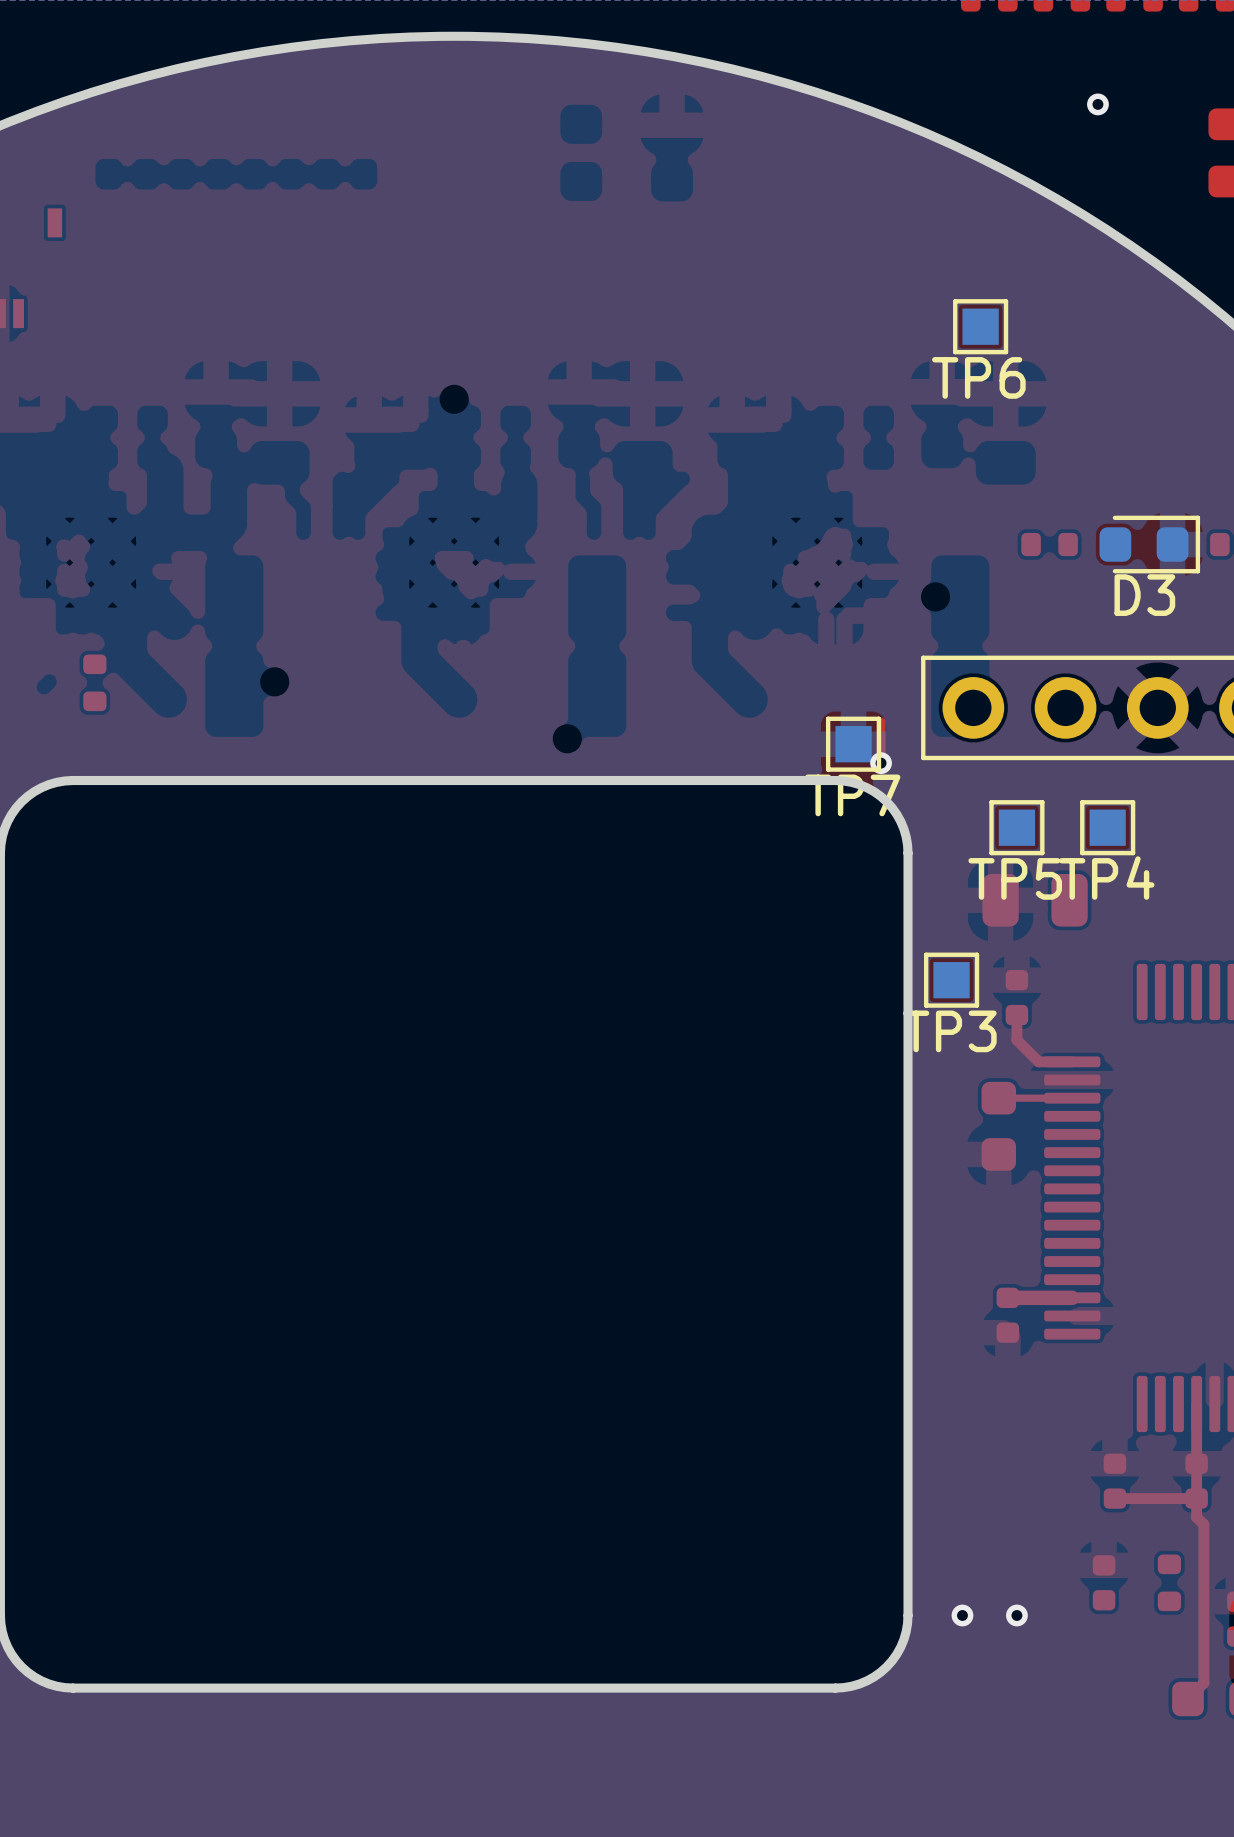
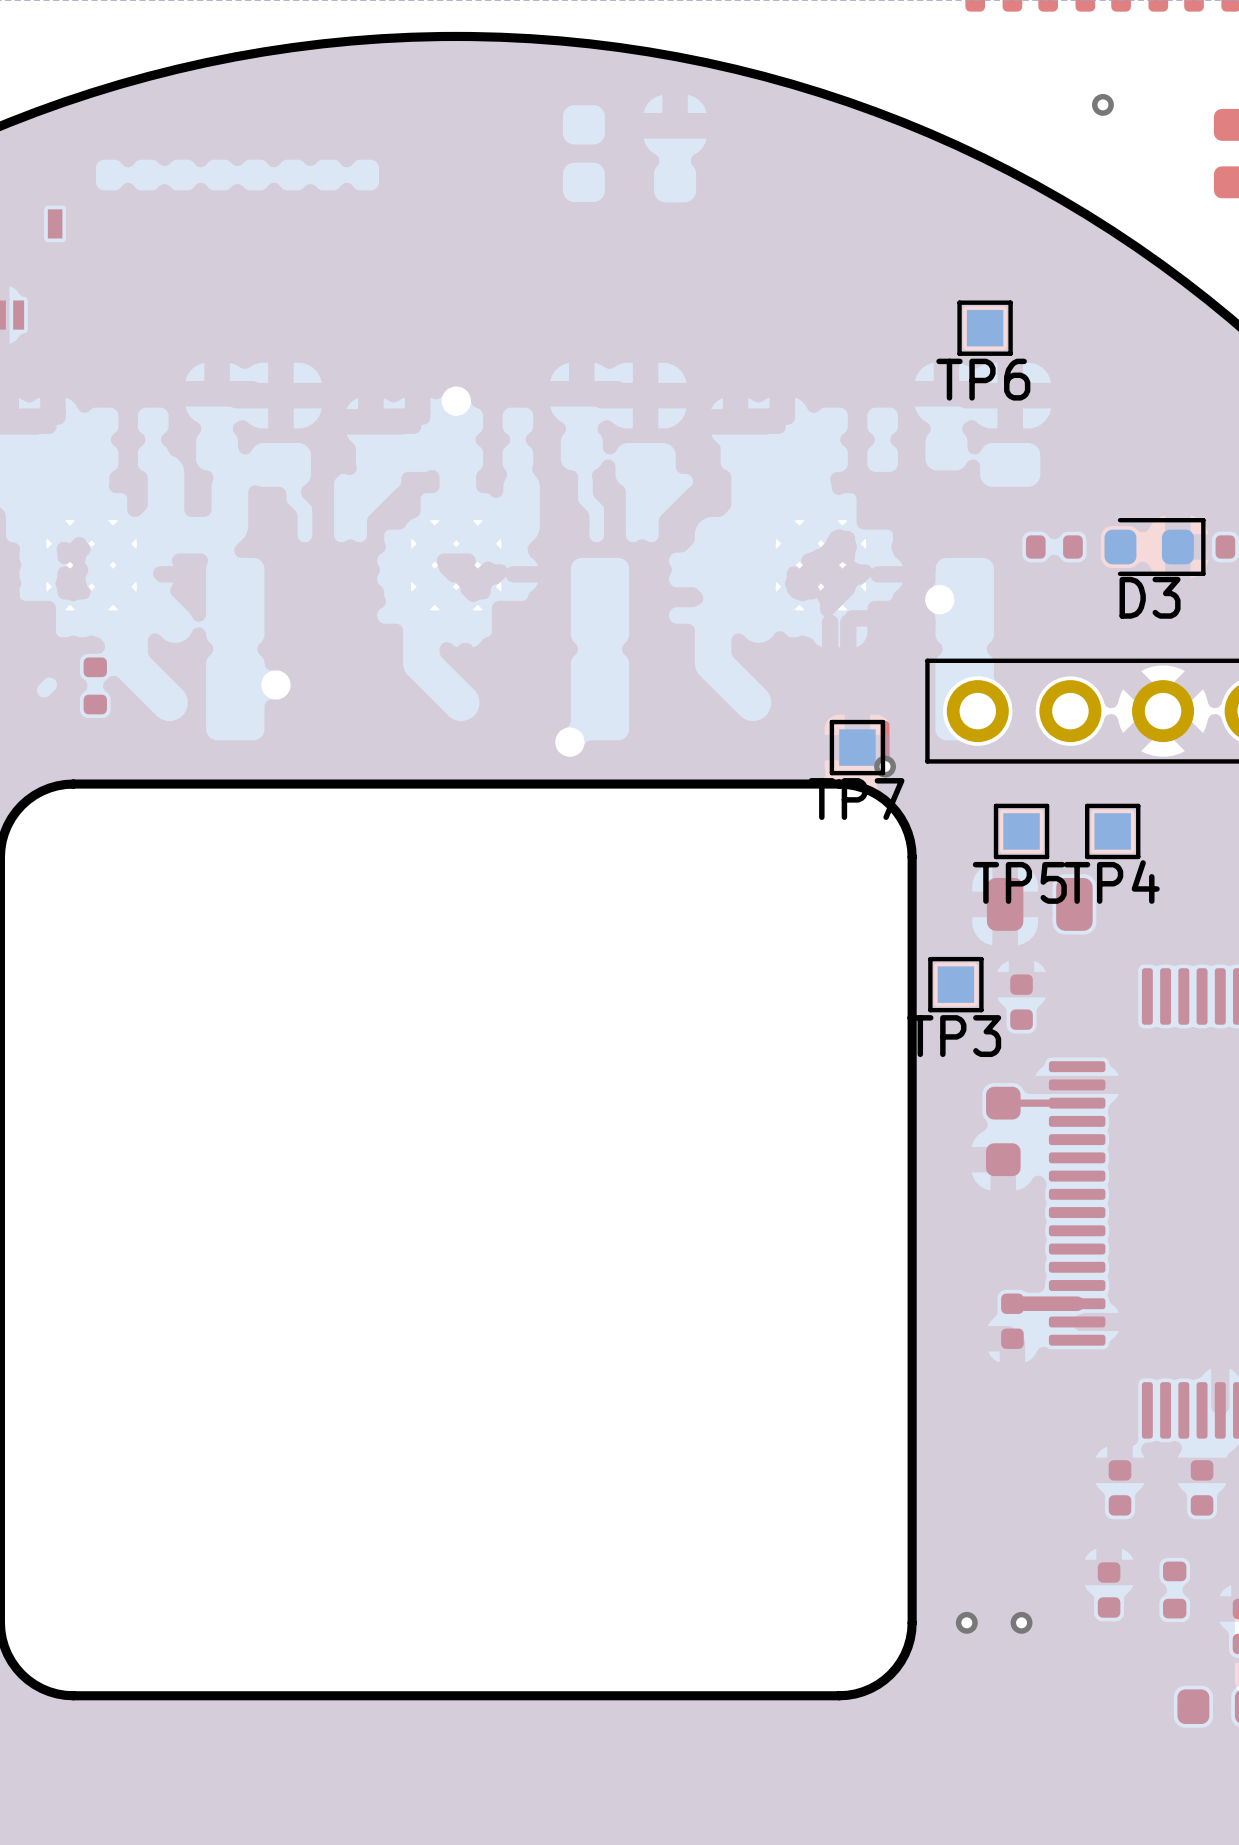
top track: (1016, 1015) (1016, 1040) (1038, 1061) (1072, 1061) -> none
top track: (1196, 1404) (1196, 1517) (1203, 1524) (1203, 1683) (1188, 1698) -> none
top track: (1196, 1498) (1114, 1498) -> none

